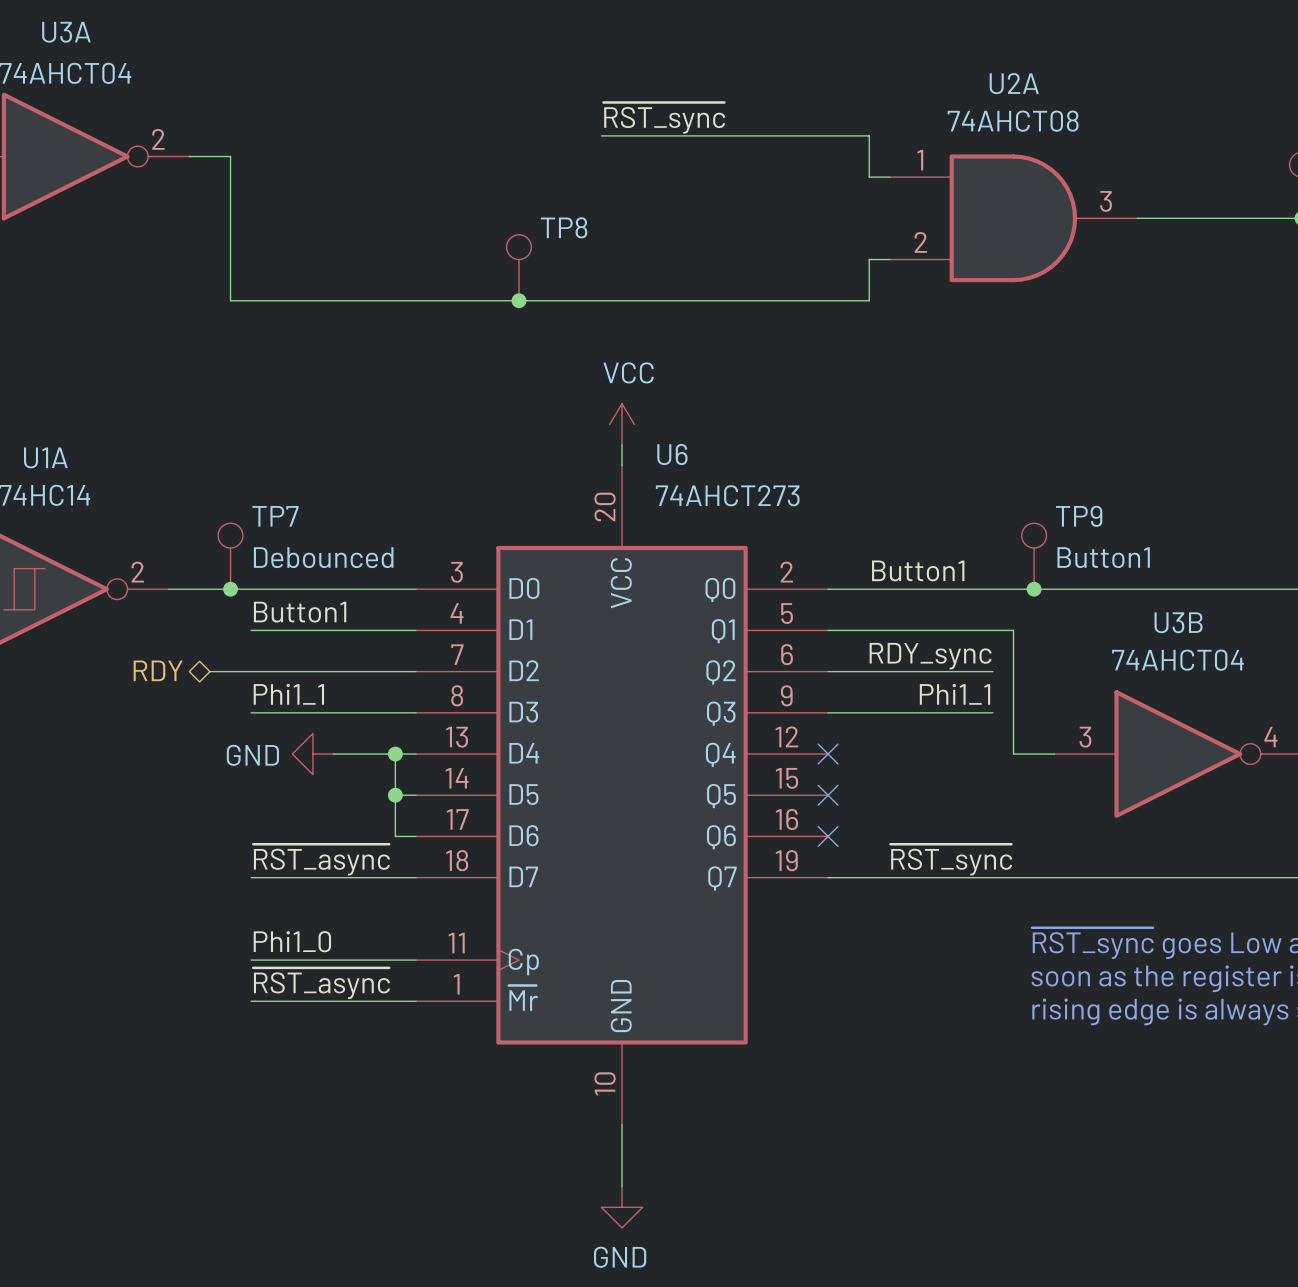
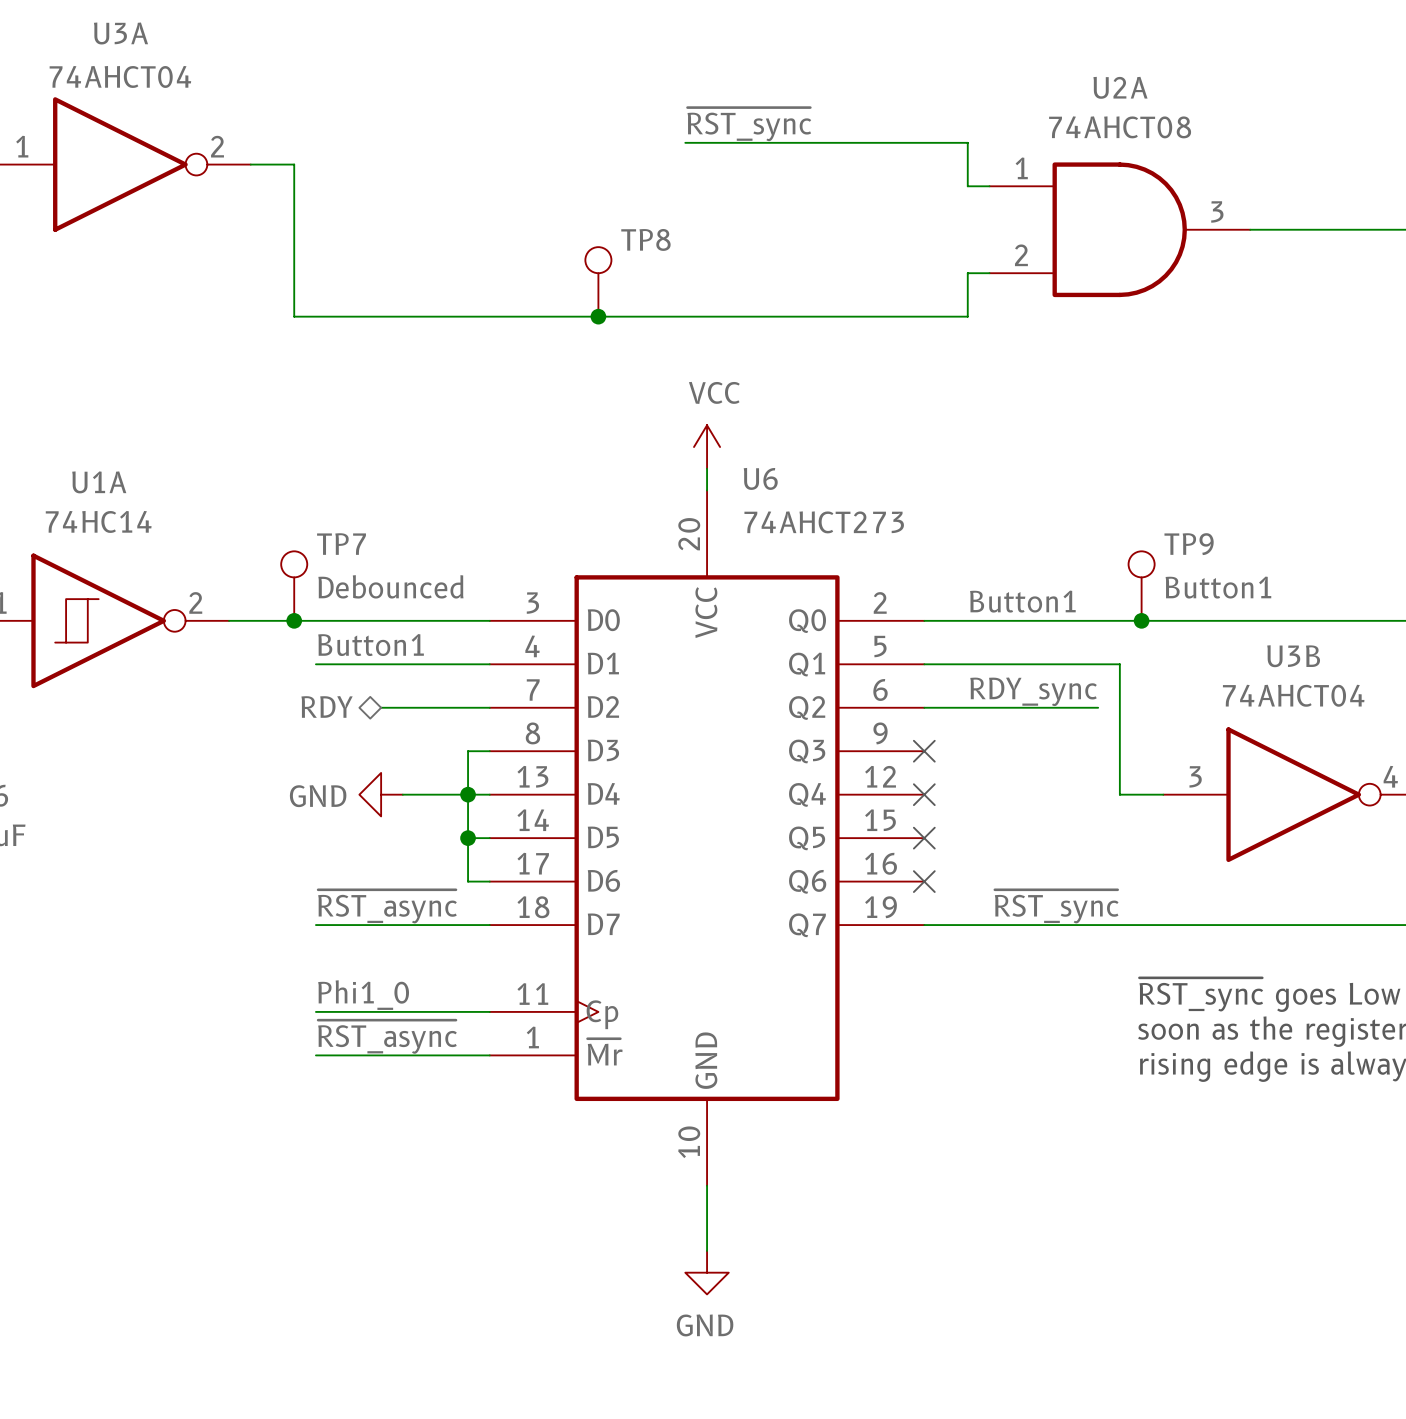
hierarchical label position: RDY (158, 670) -> RDY (327, 706)
wire: (209, 671) (312, 671) -> none
label: Phi1_1 (288, 694) -> none
label: Phi1_1 (954, 694) -> none
wire: (251, 712) (395, 712) -> (468, 794) (468, 751)
wire: (828, 712) (992, 712) -> none
no-connect mark: none -> (924, 751)

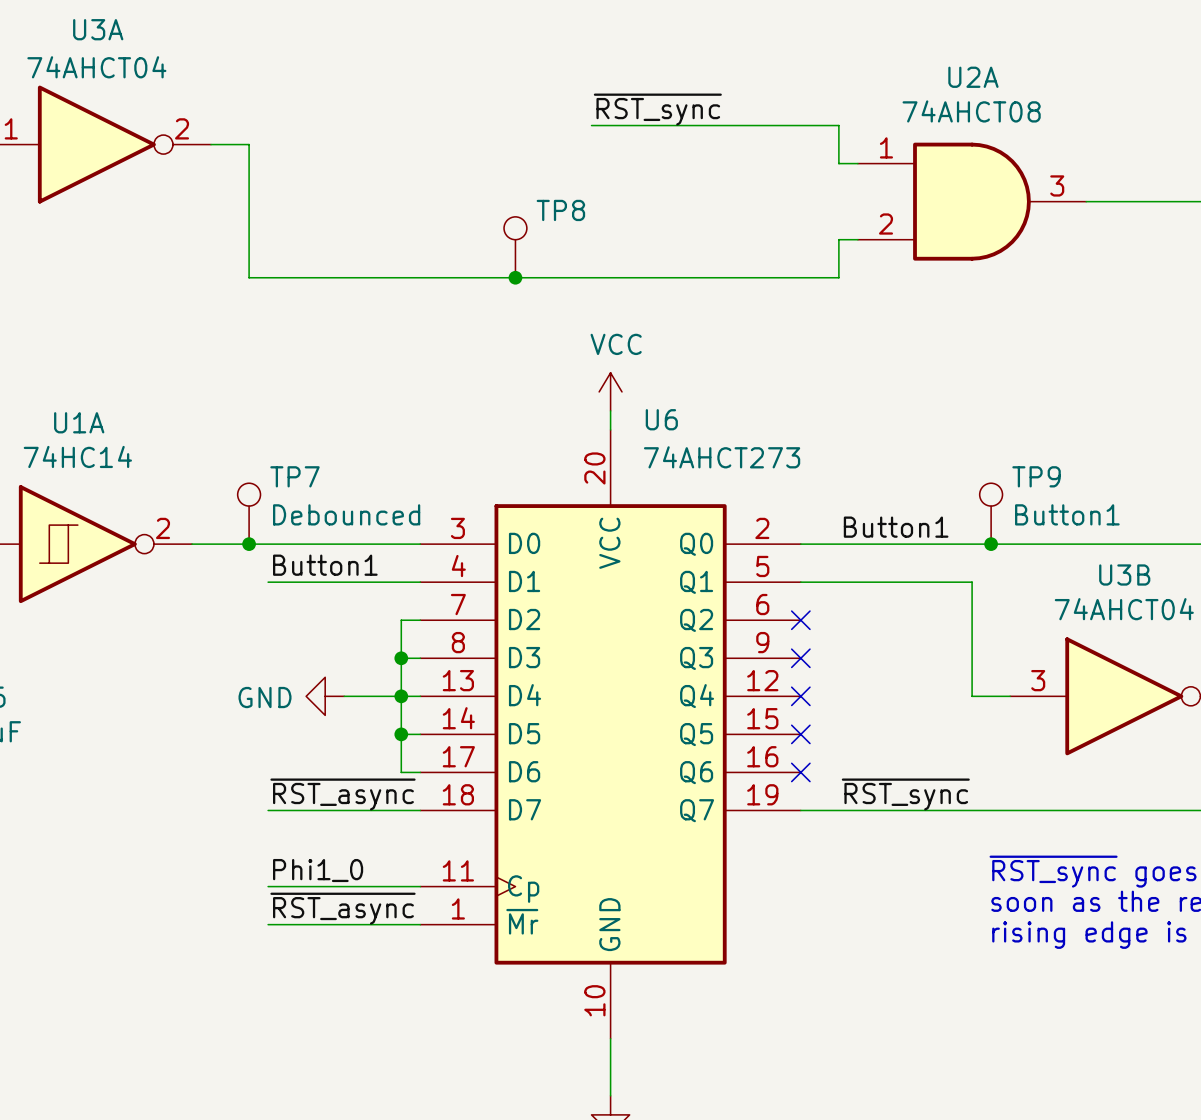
label: RDY_sync (1033, 691) -> none
hierarchical label: RDY (327, 706) -> none
wire: (381, 707) (468, 707) -> (401, 658) (401, 620)
wire: (924, 707) (1098, 707) -> none
no-connect mark: none -> (800, 620)
junction: none -> (401, 658)

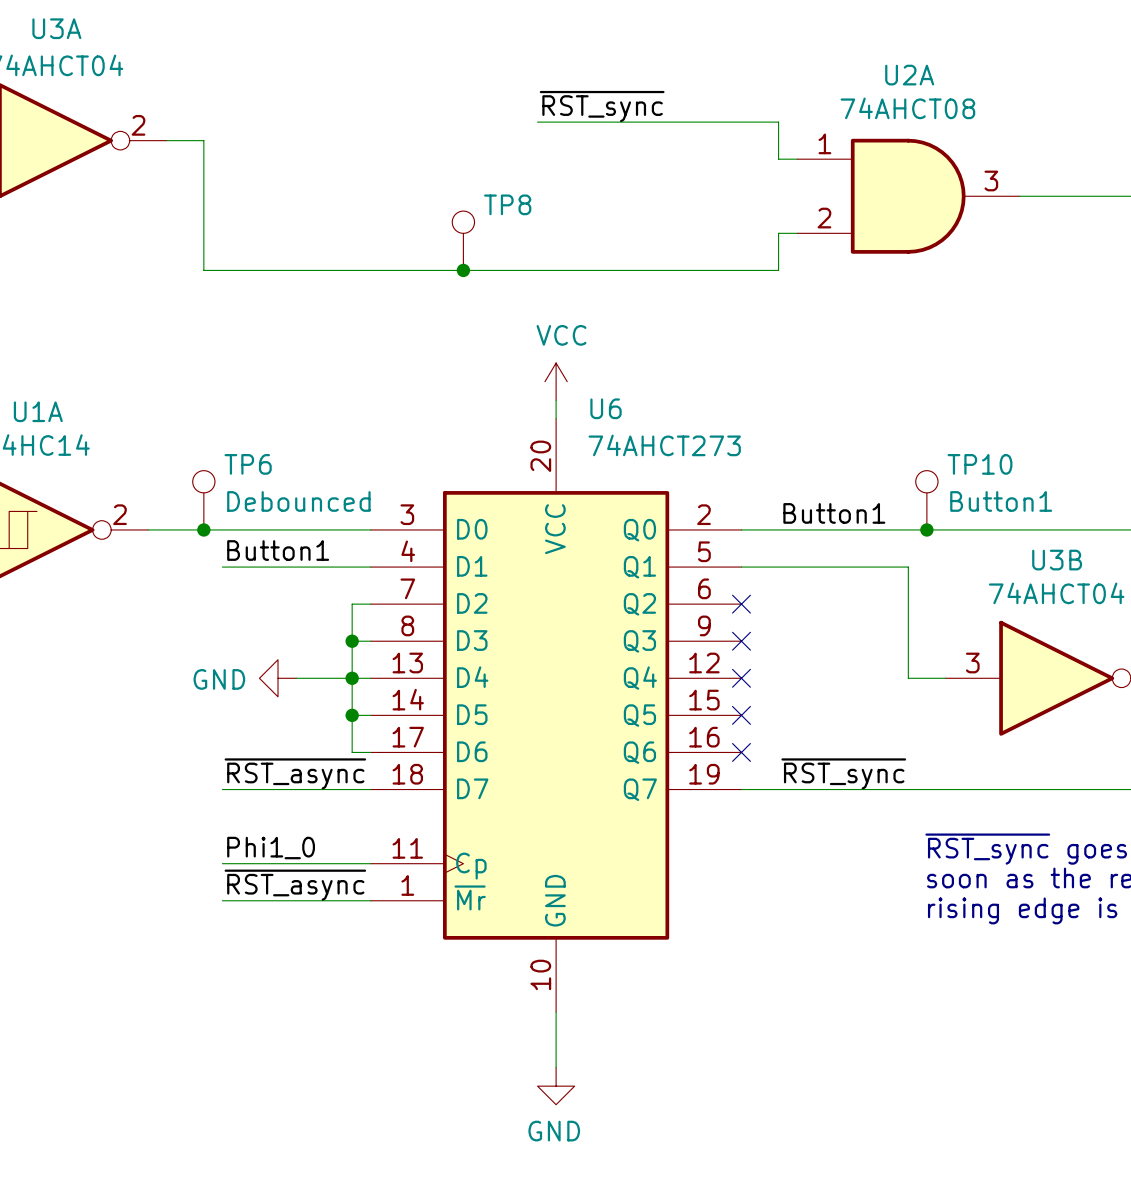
TP7 name: TP7 (294, 476) -> TP6 (248, 464)
TP9 name: TP9 (1036, 476) -> TP10 (979, 464)

